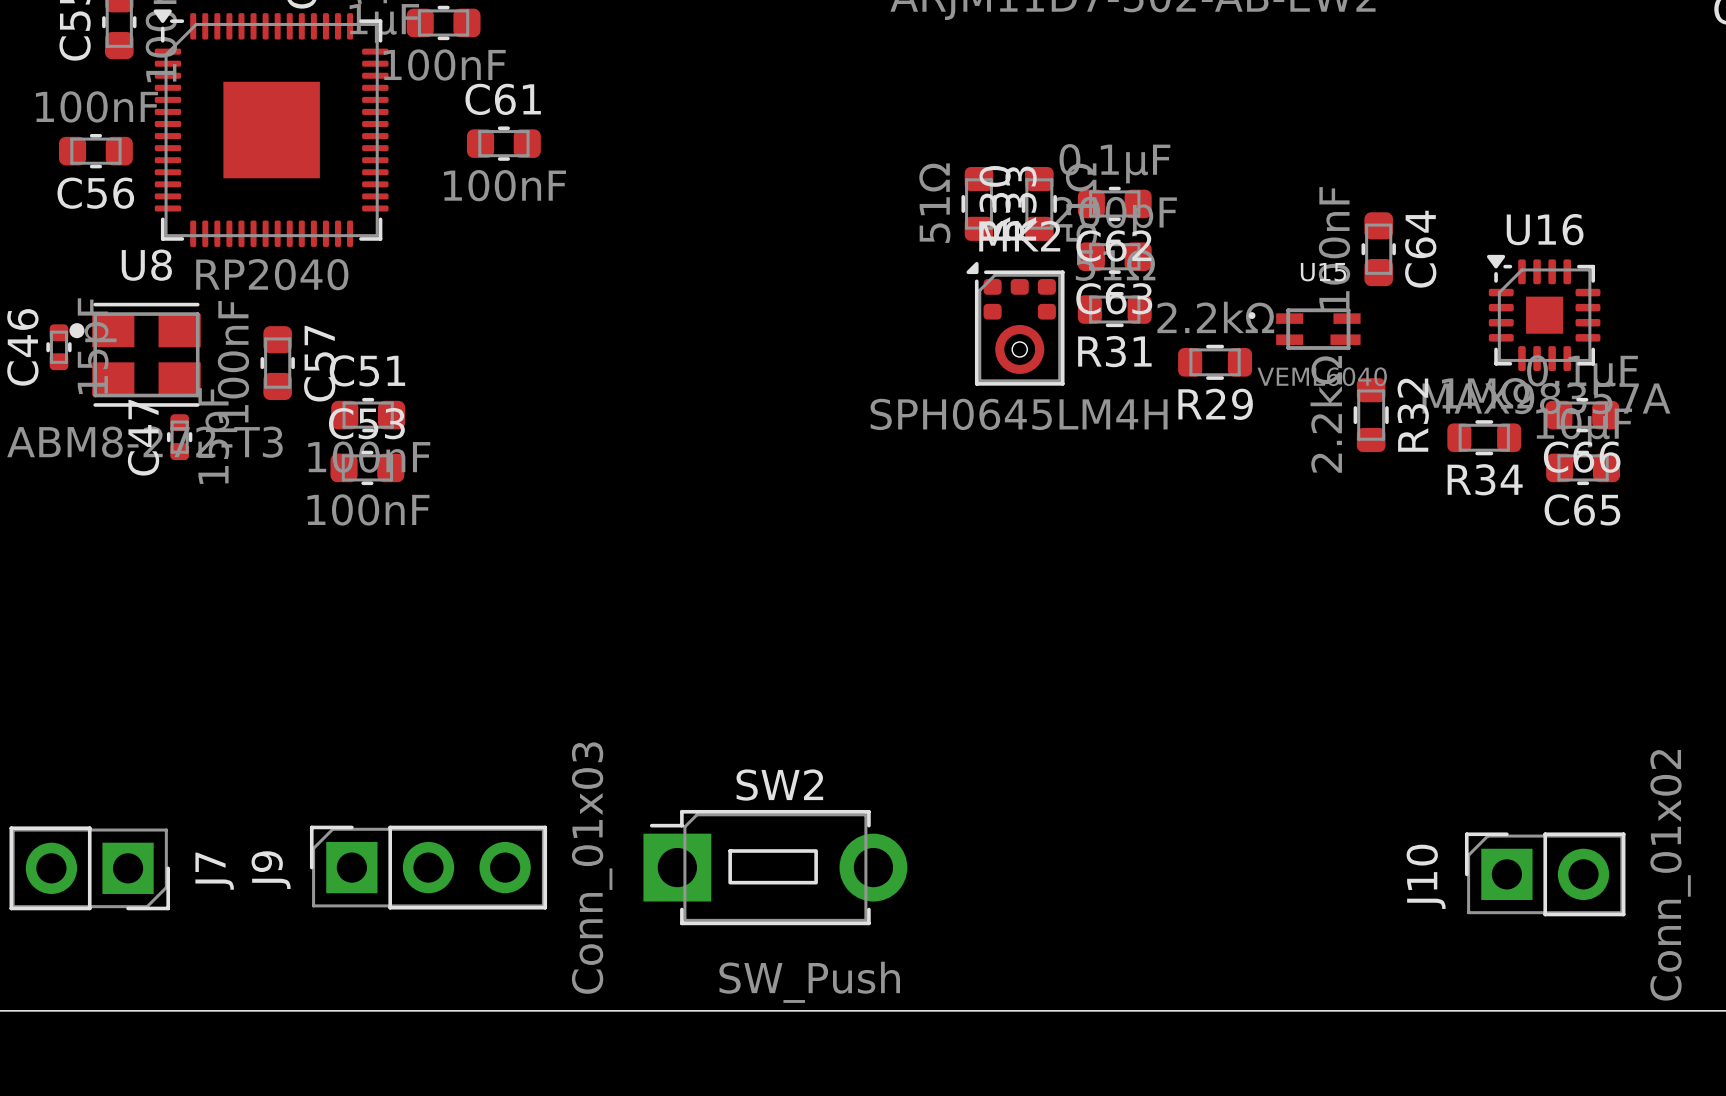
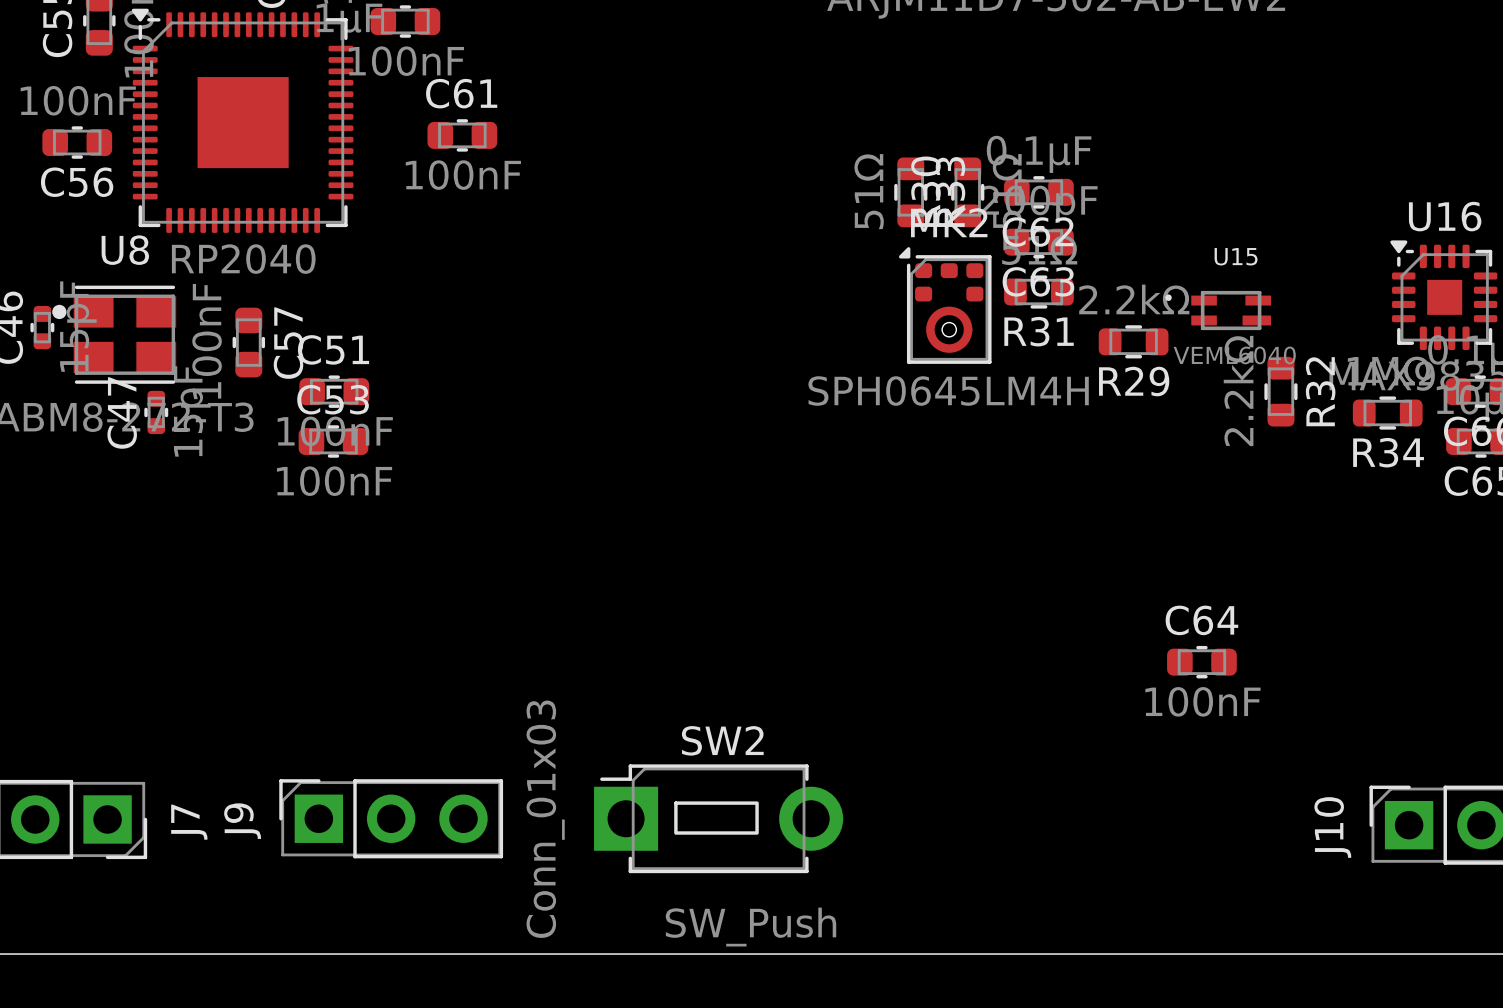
C64 value position: 100nF (1334, 248) -> 100nF (1202, 701)
C64 rotation: 0° (1378, 249) -> 90° clockwise (1201, 662)
C64 position: (1378, 249) -> (1201, 662)
C64 name position: C64 (1420, 249) -> C64 (1201, 620)

